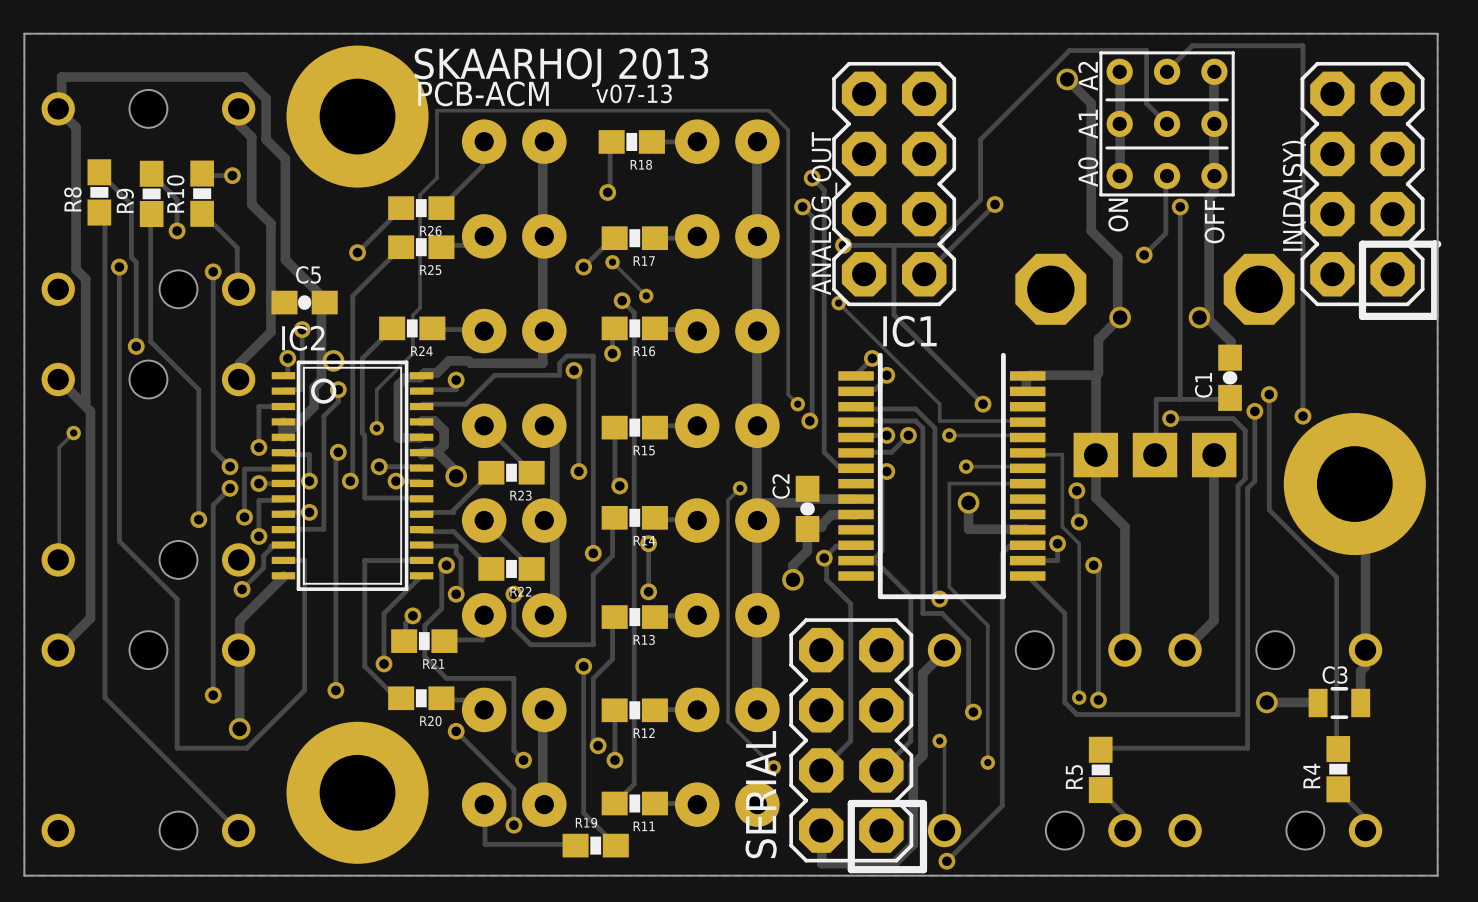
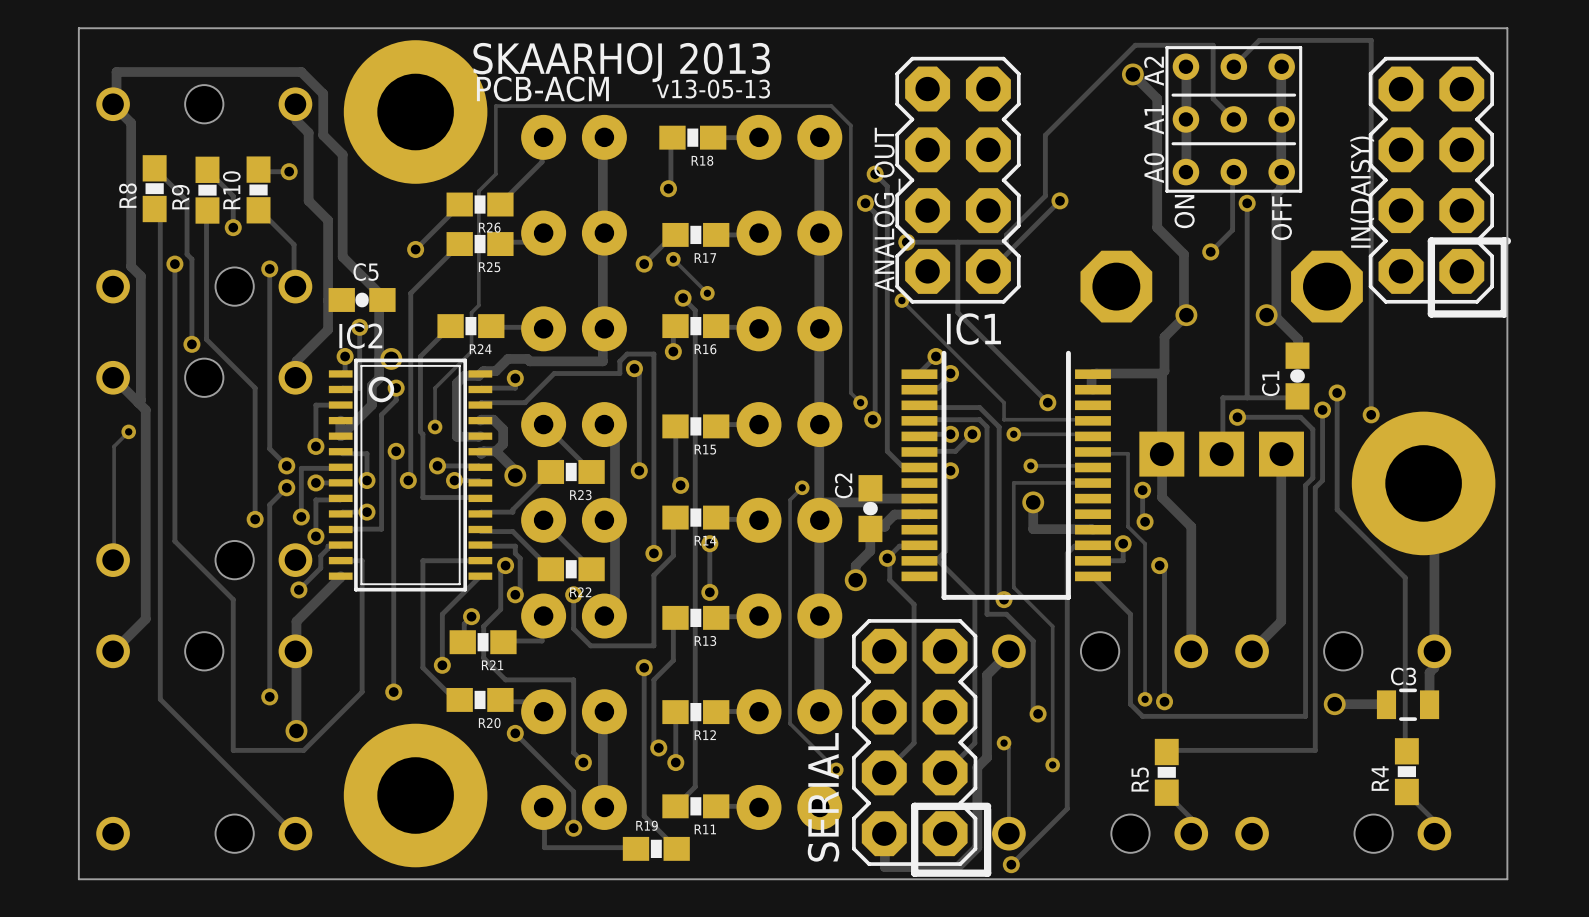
text: v07-13 (634, 93) -> v13-05-13 (713, 89)

